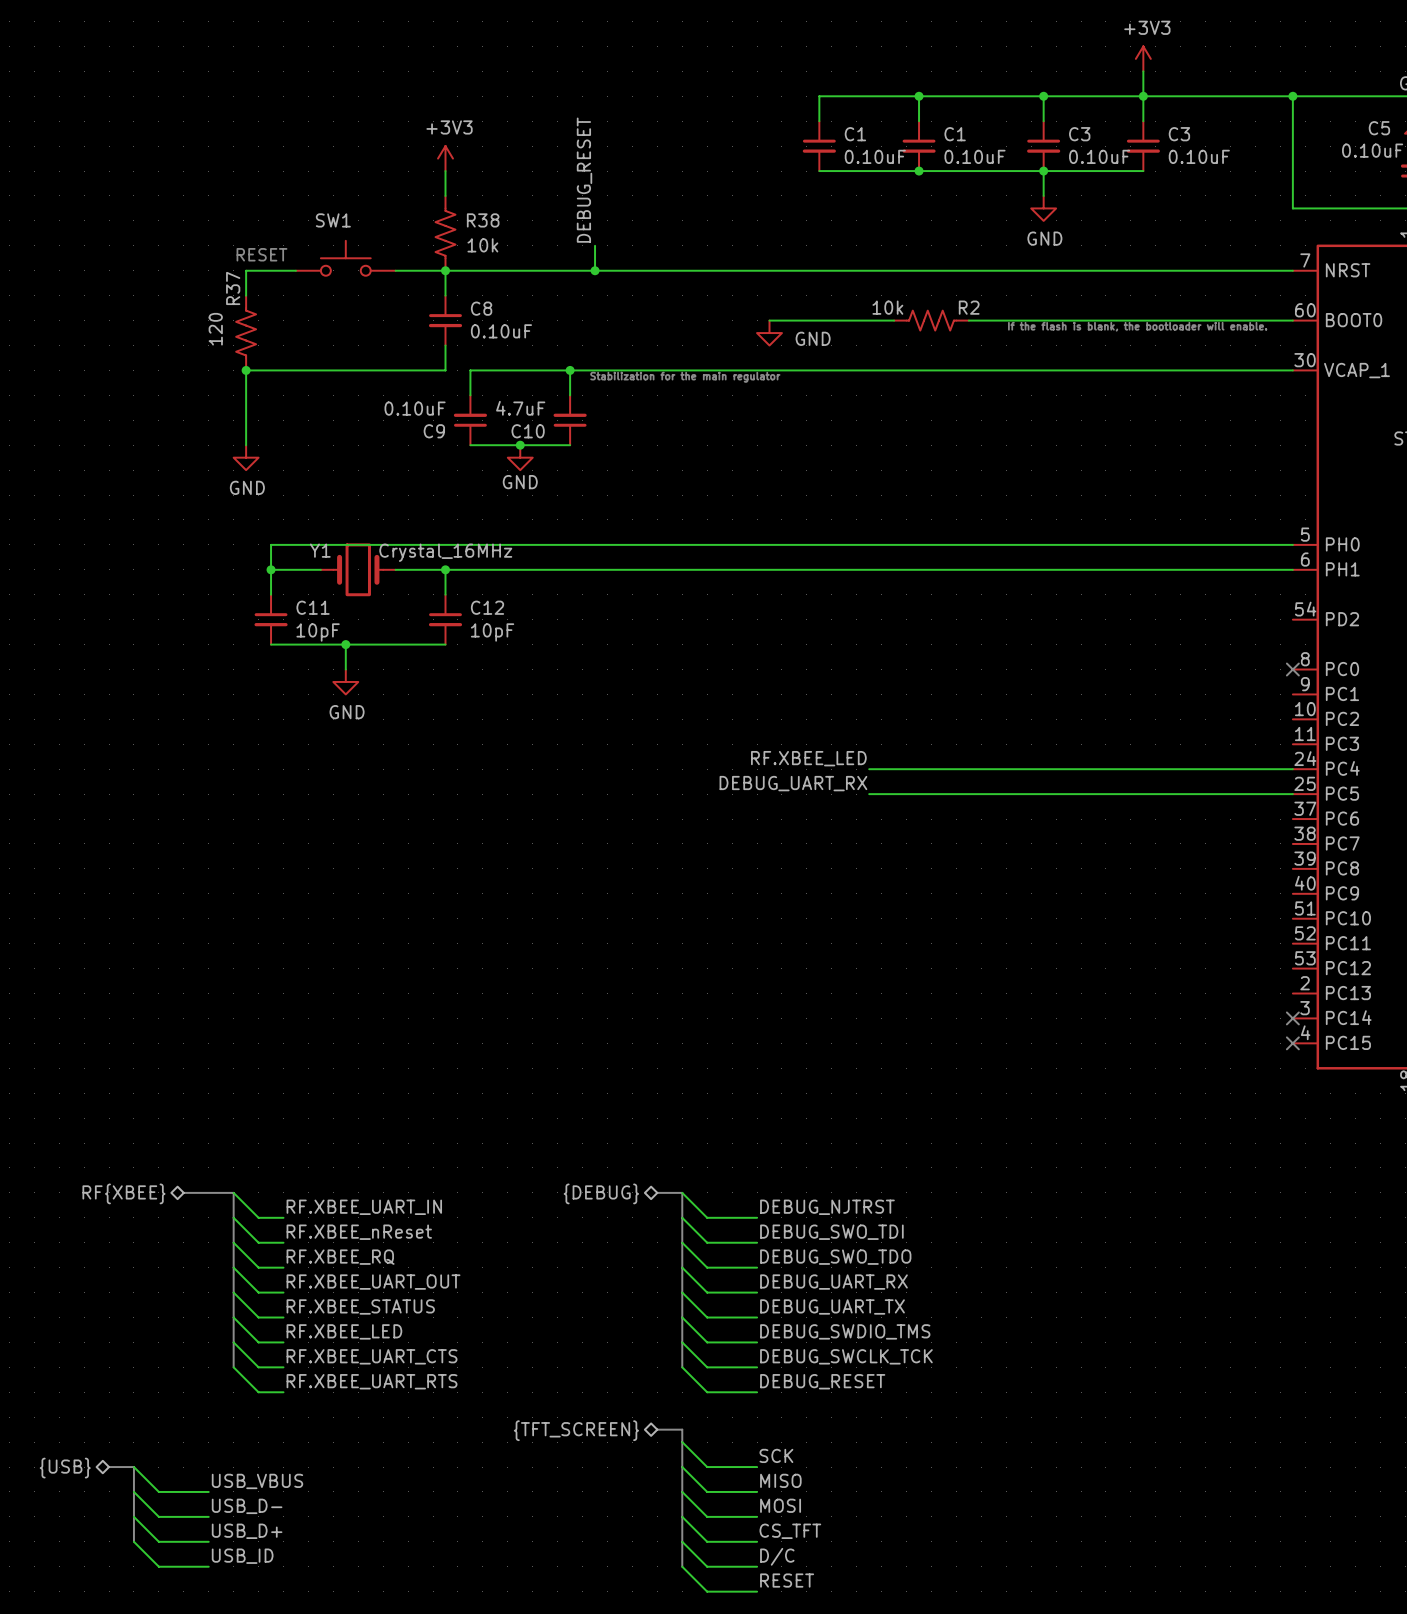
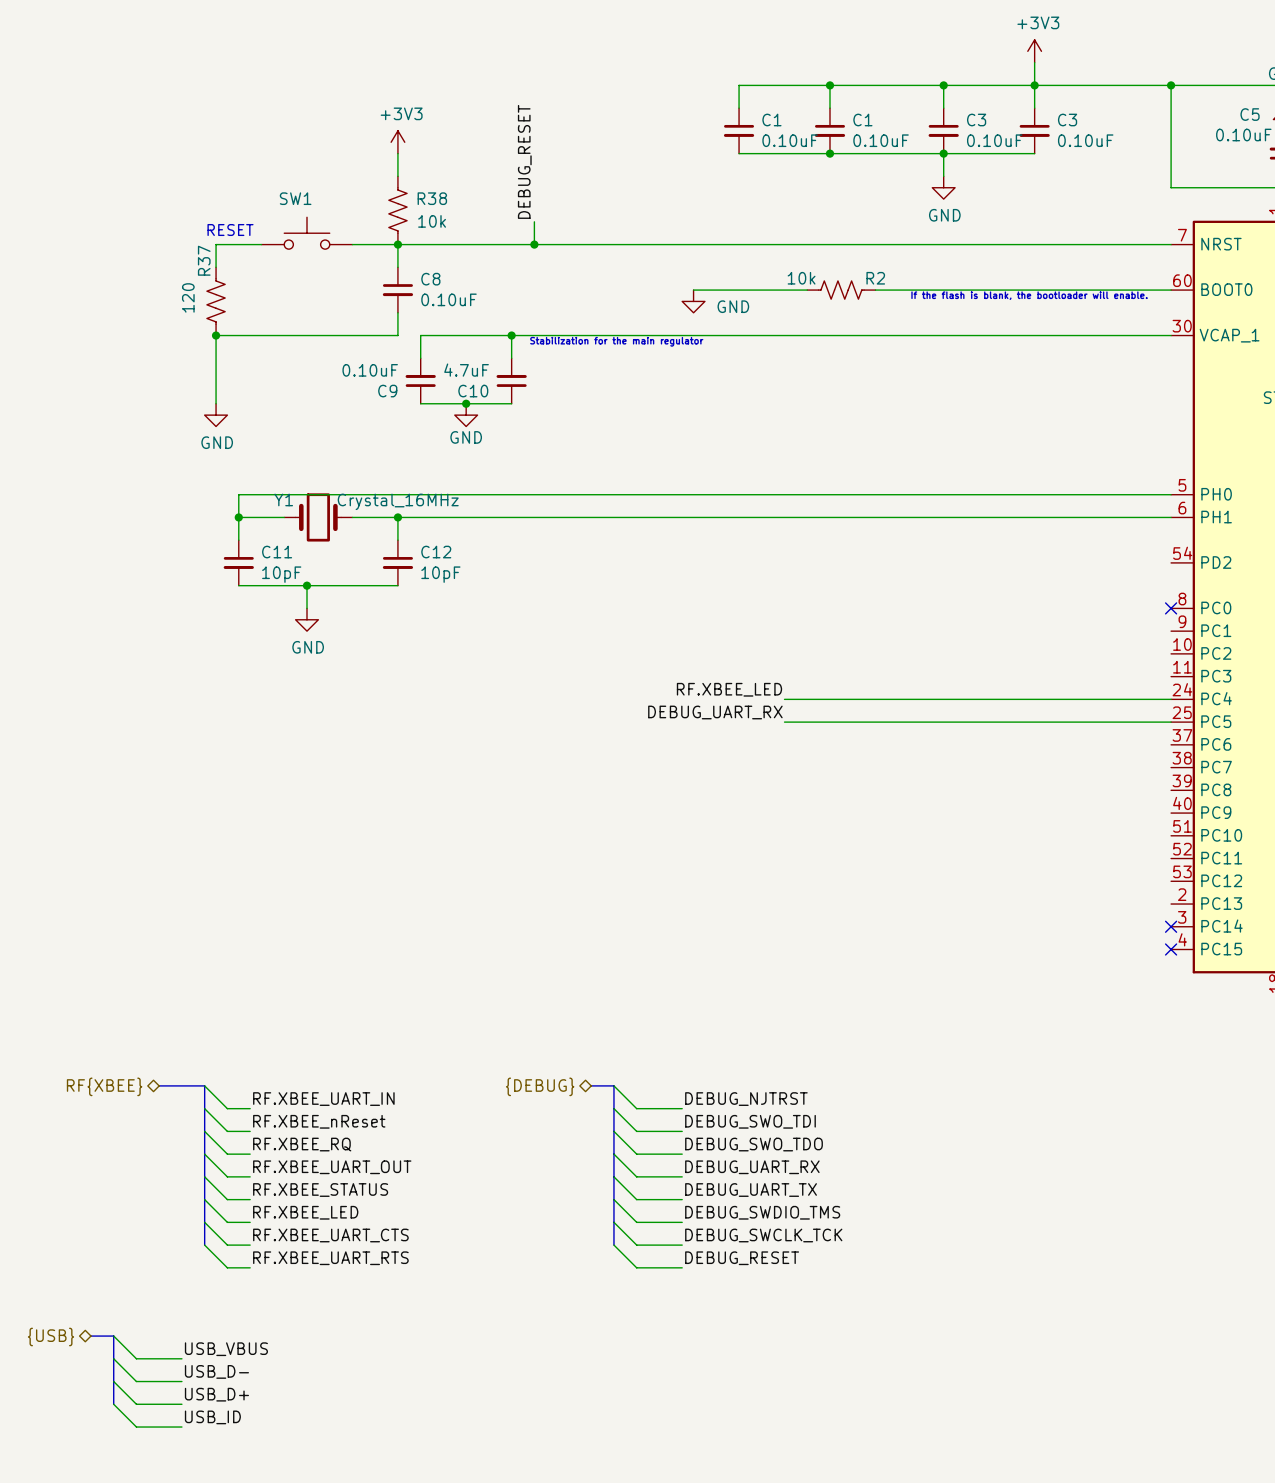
bus: (657, 1429) (682, 1429) (682, 1566) -> none
hierarchical label: {TFT_SCREEN} (576, 1430) -> none
wire: (682, 1442) (707, 1467) (757, 1467) -> none
label: SCK (776, 1455) -> none
wire: (682, 1467) (707, 1491) (757, 1491) -> none
label: MISO (780, 1480) -> none
wire: (682, 1491) (707, 1516) (757, 1516) -> none
label: MOSI (780, 1505) -> none
wire: (682, 1516) (707, 1541) (757, 1541) -> none
label: CS_TFT (790, 1531) -> none
wire: (682, 1541) (707, 1566) (757, 1566) -> none
label: D/C (777, 1556) -> none
wire: (682, 1566) (707, 1591) (757, 1591) -> none
label: RESET (787, 1580) -> none

